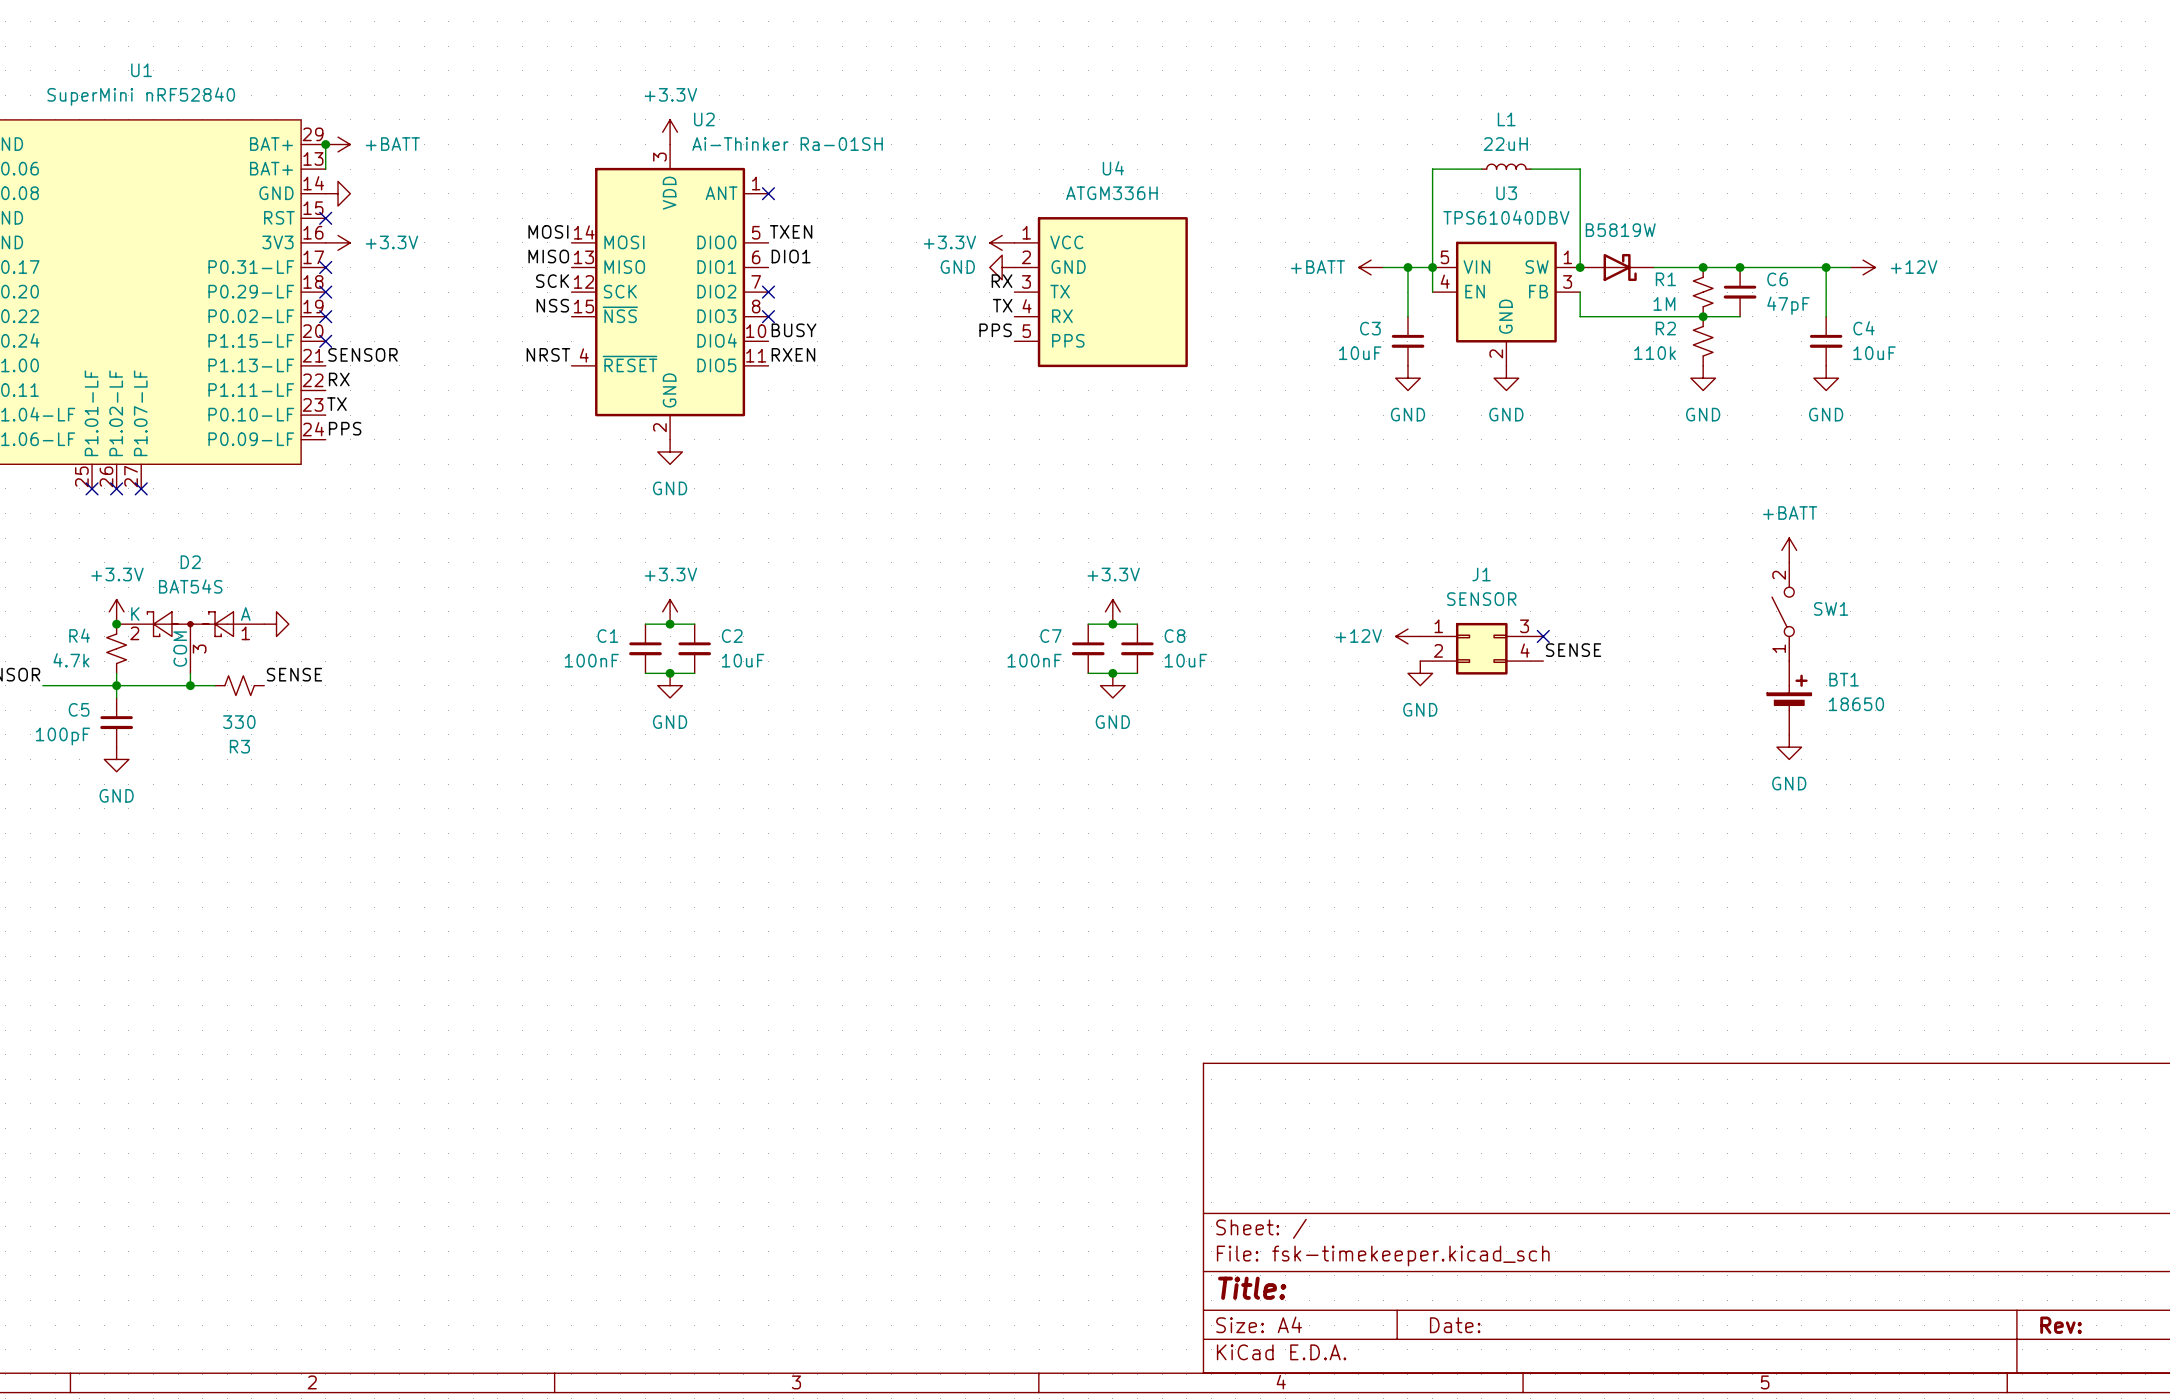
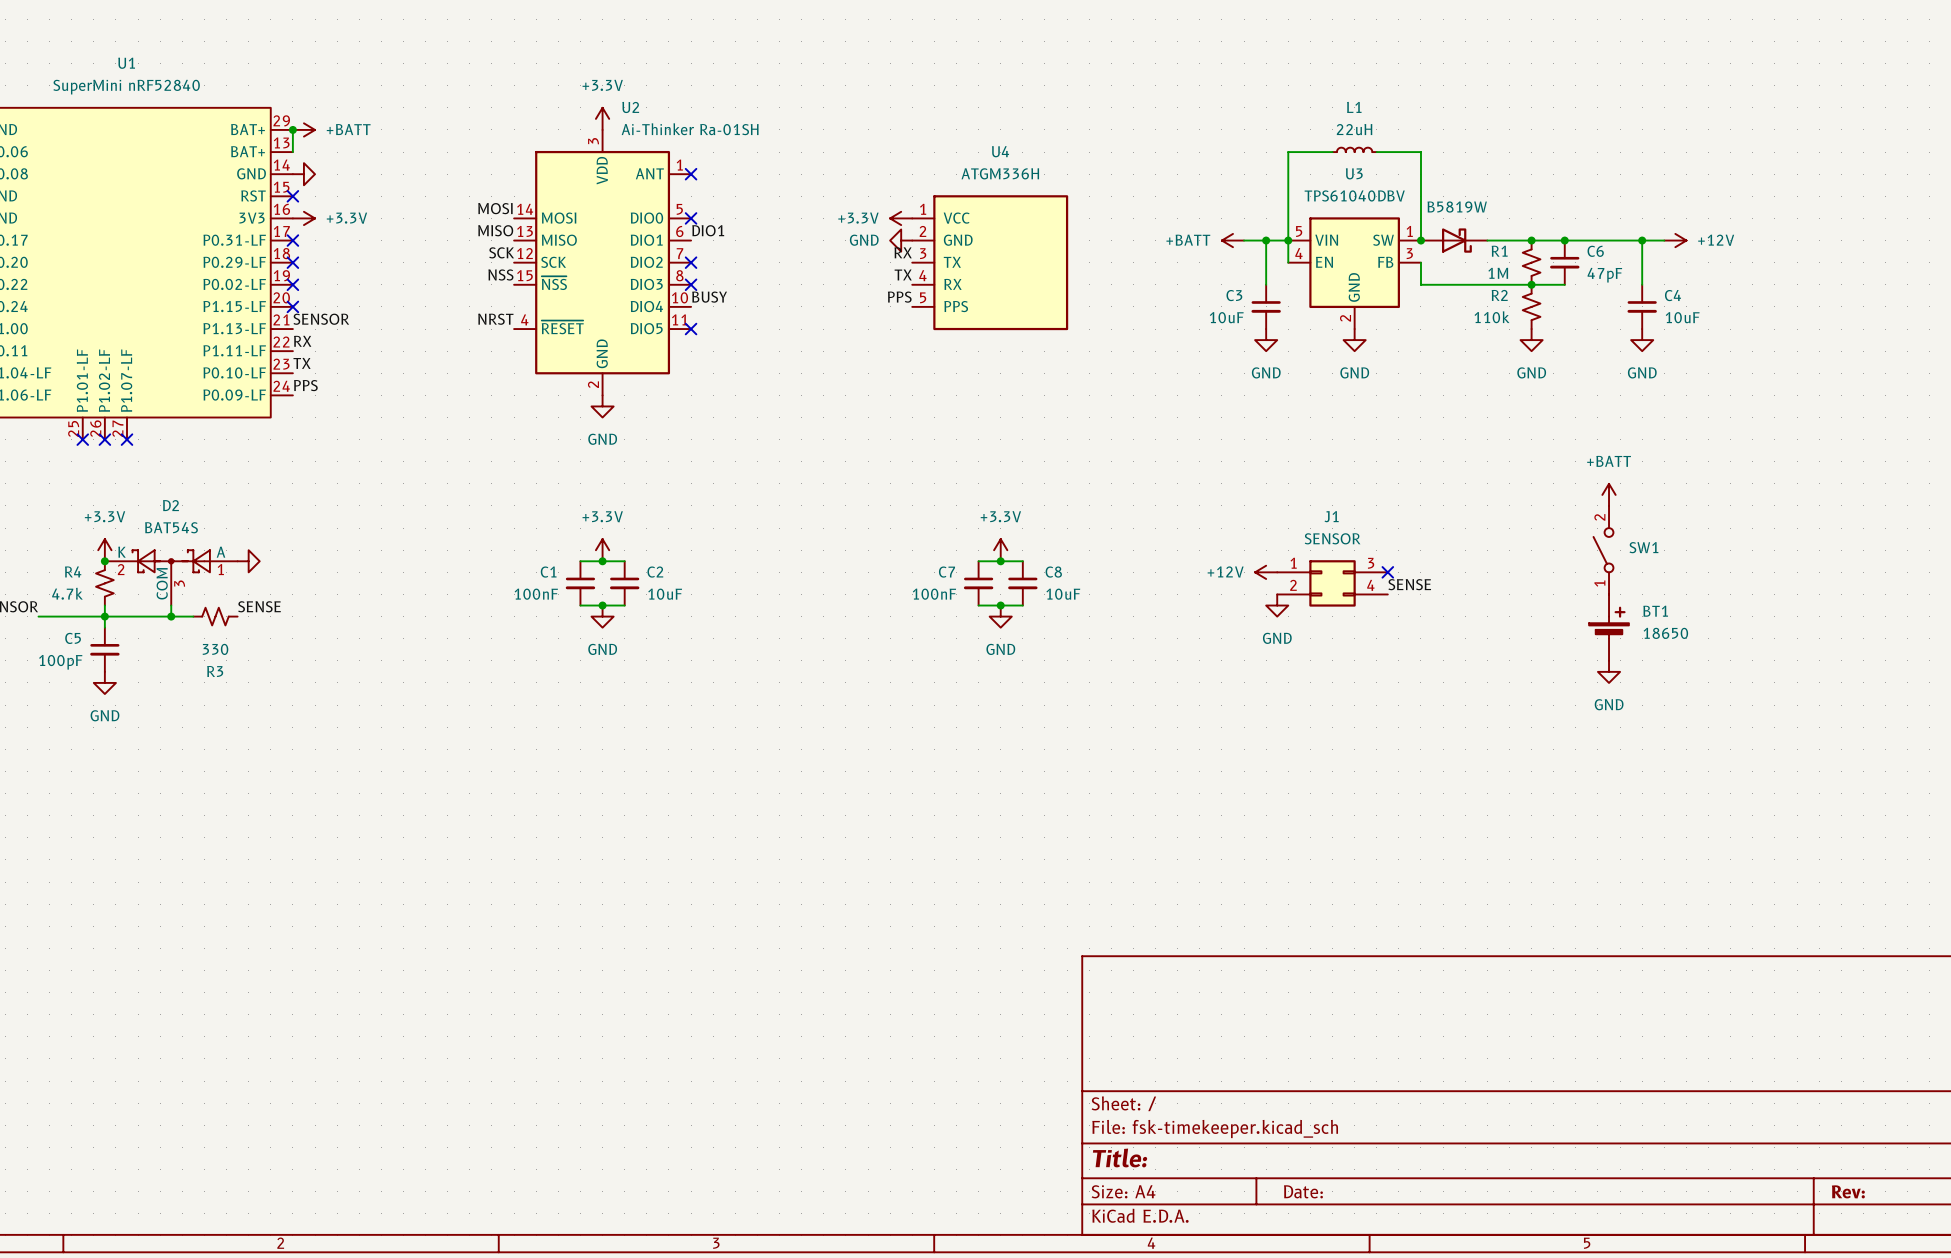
label: TXEN (791, 231) -> none
no-connect mark: none -> (691, 218)
label: RXEN (793, 354) -> none
no-connect mark: none -> (691, 329)

